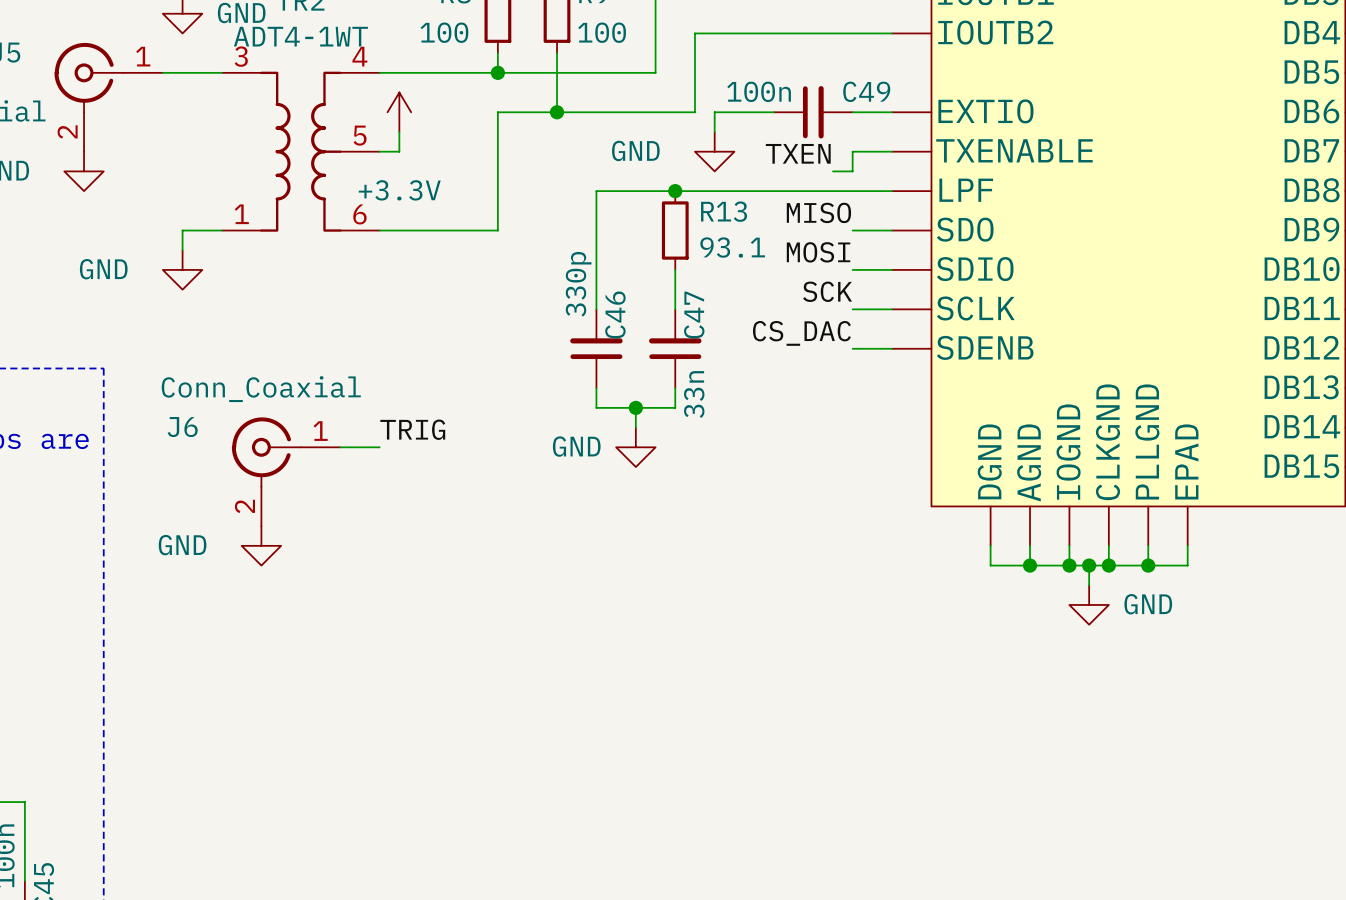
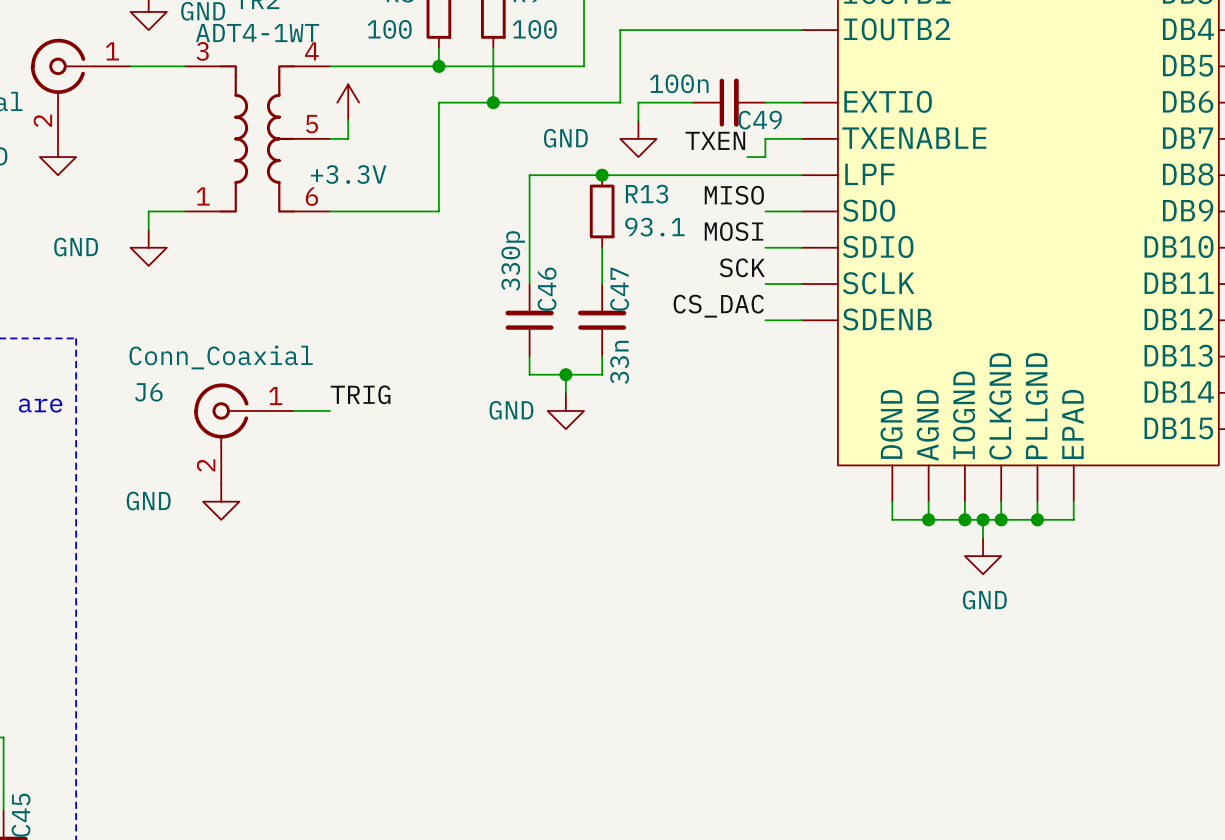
C49 name position: C49 (866, 91) -> C49 (760, 120)
power symbol text position: GND (1148, 604) -> GND (984, 600)

